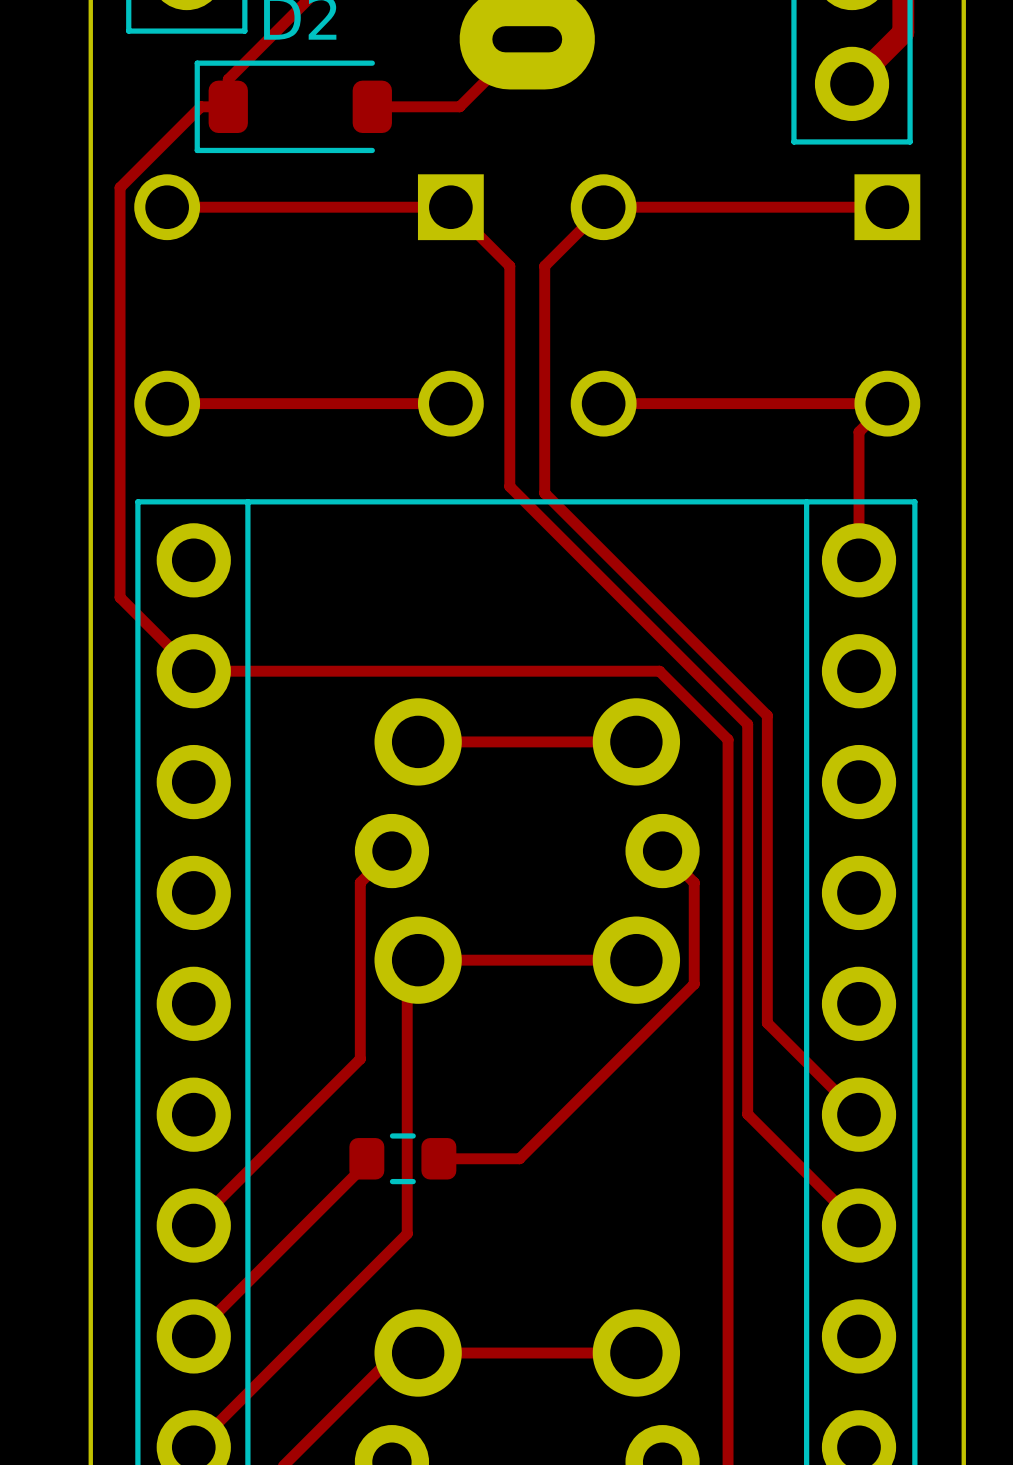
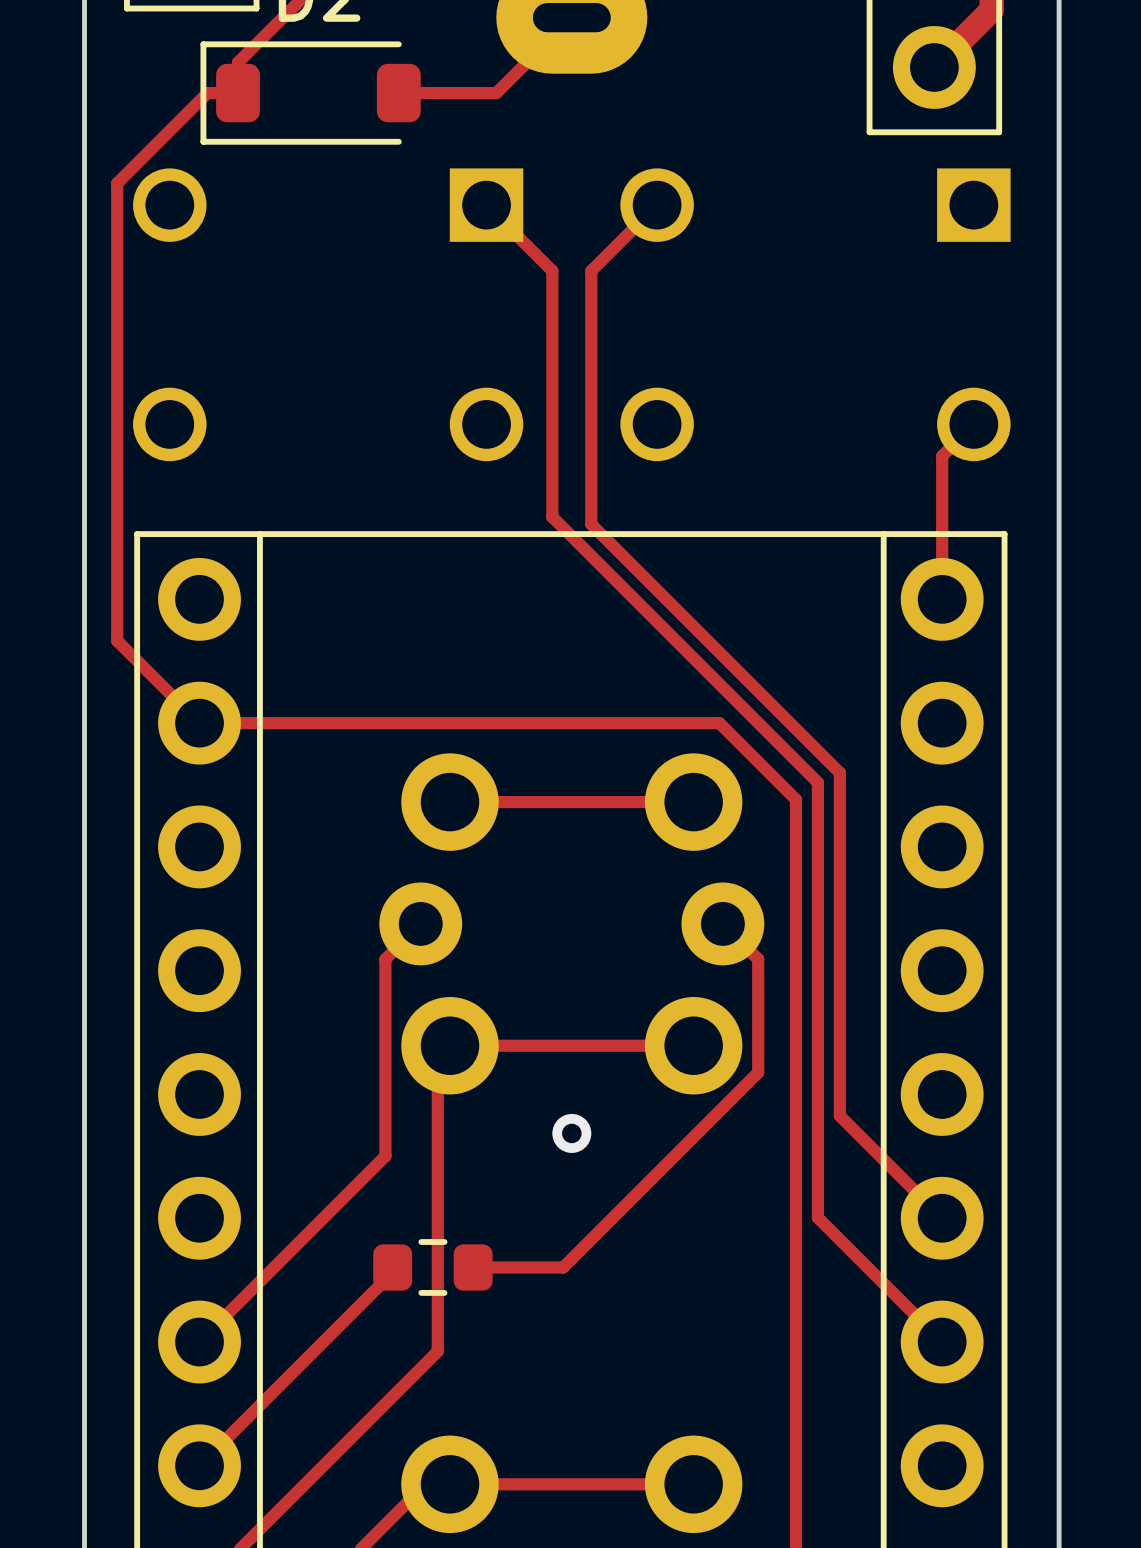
track: (167, 207) (450, 207) -> none
track: (603, 207) (887, 207) -> none
track: (167, 403) (450, 403) -> none
track: (603, 403) (887, 403) -> none
via: none -> (571, 1133)

